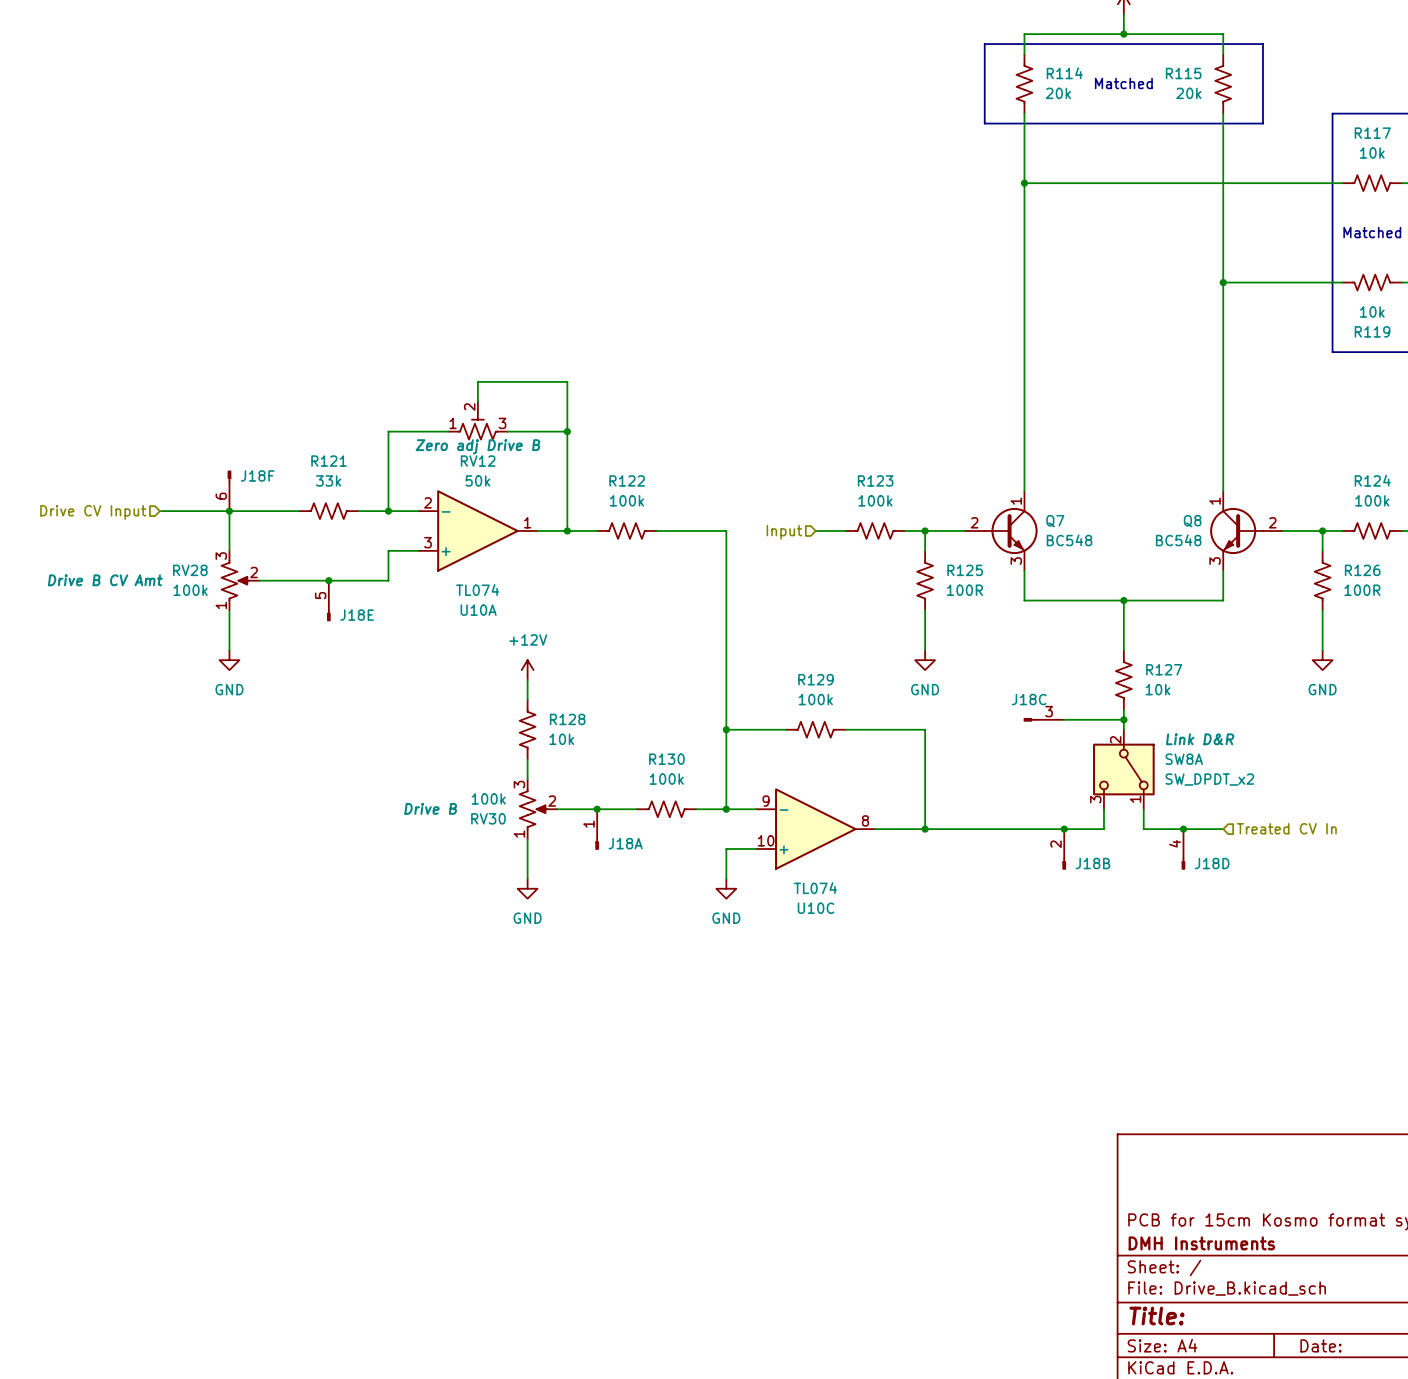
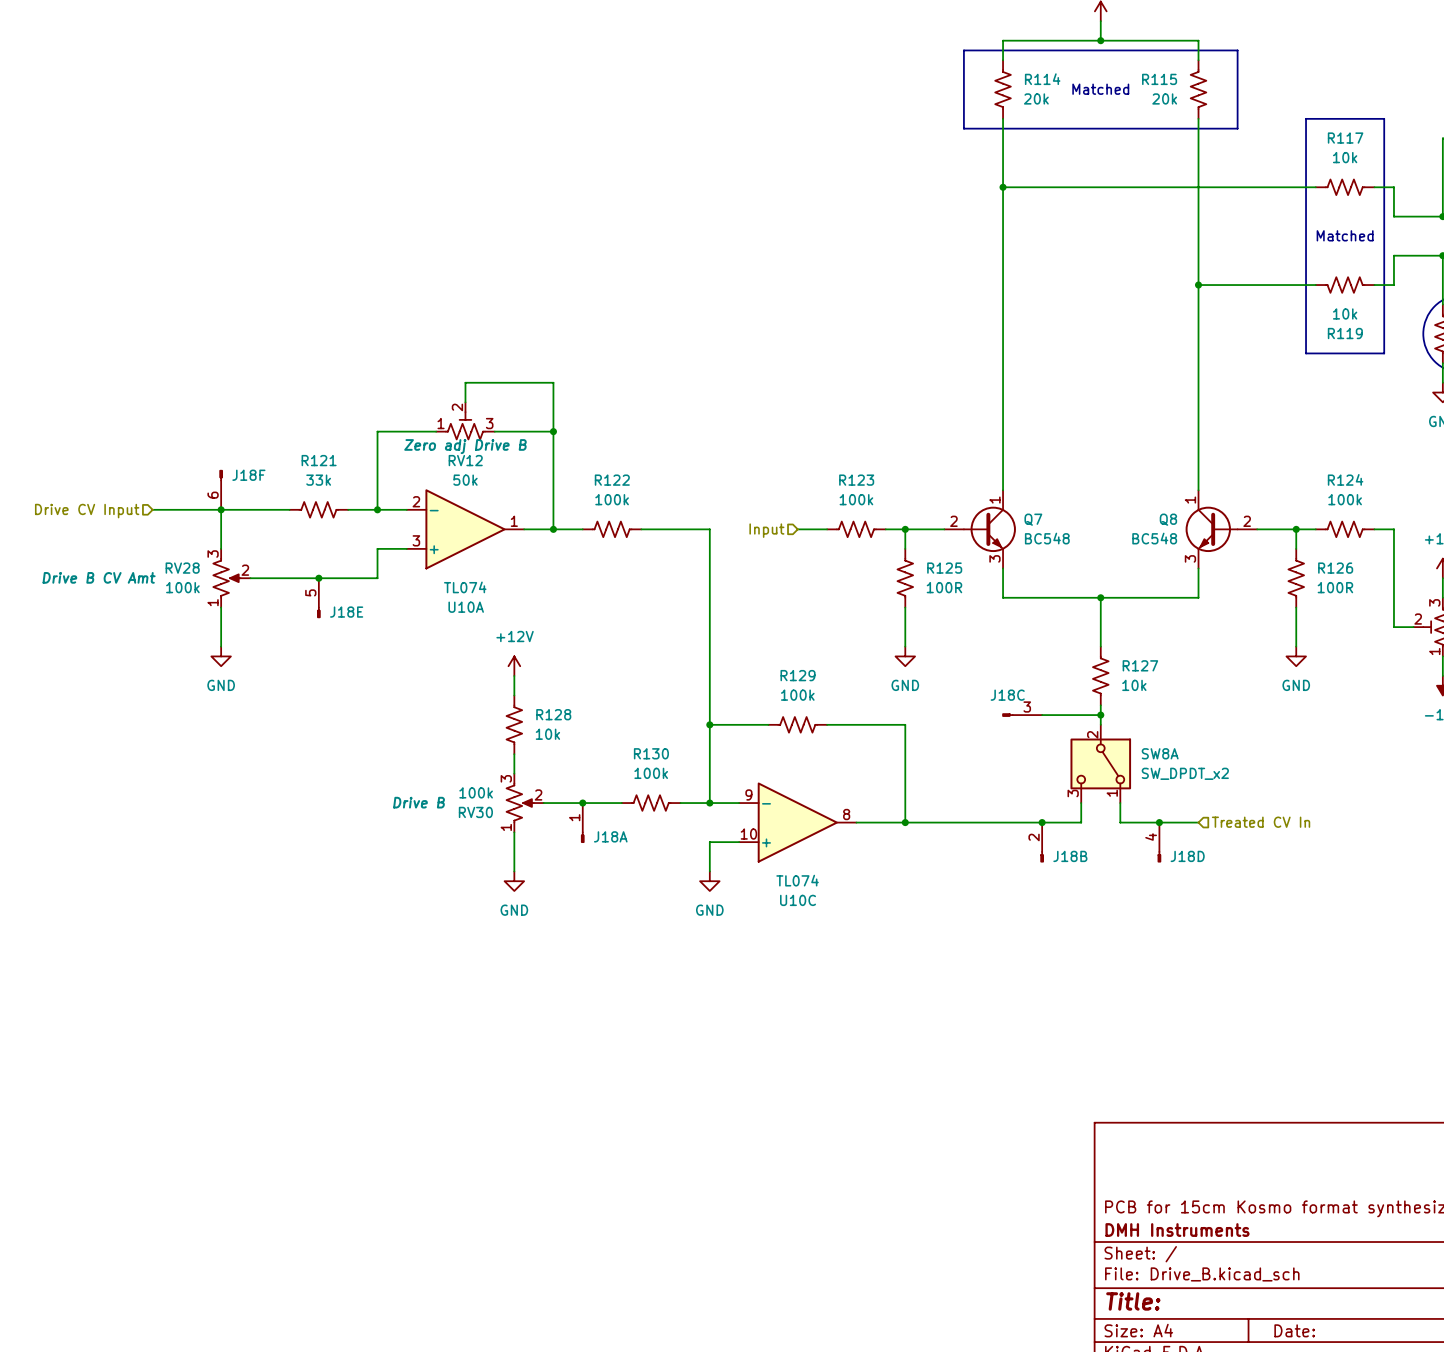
SW8A text: Link D&R (1200, 739) -> none

